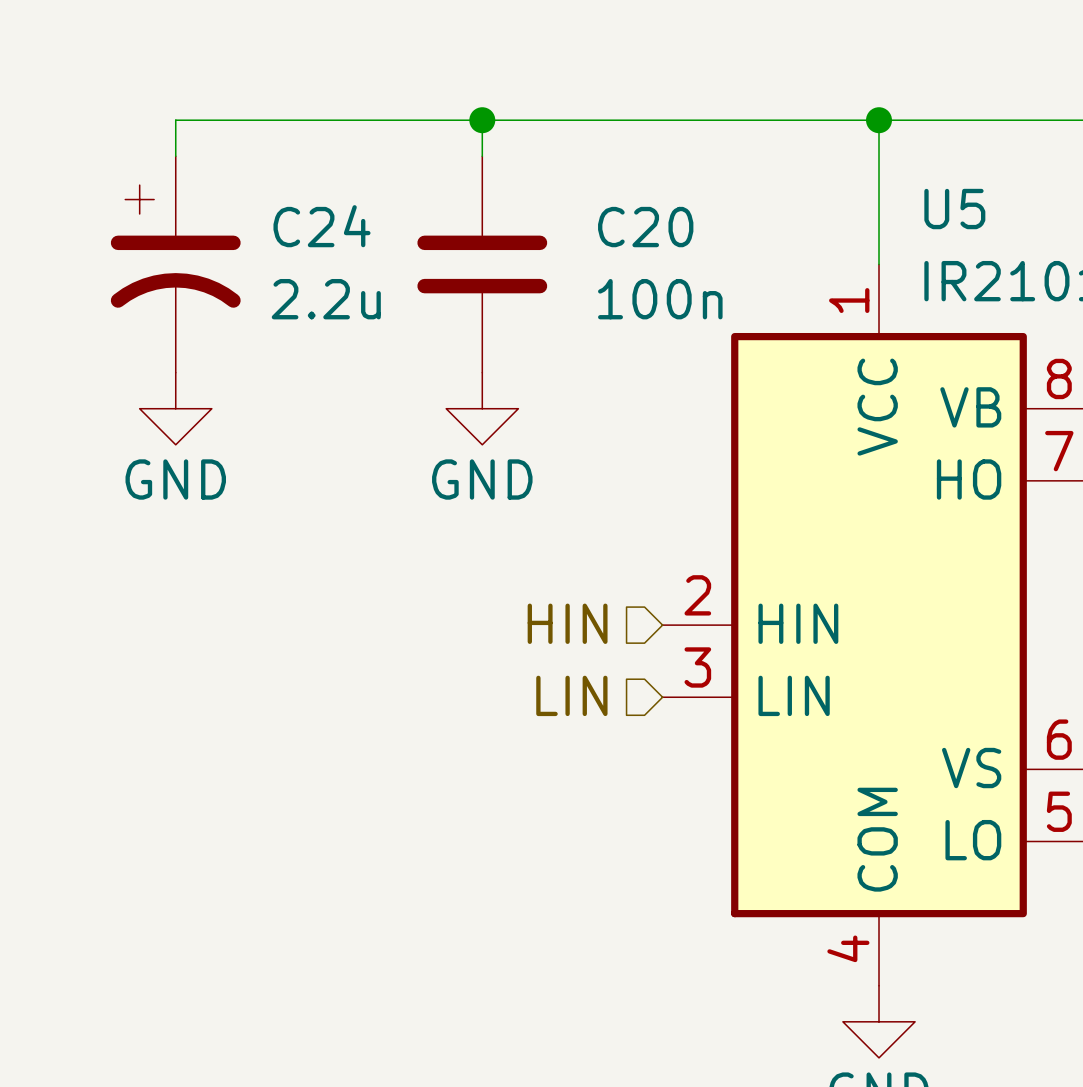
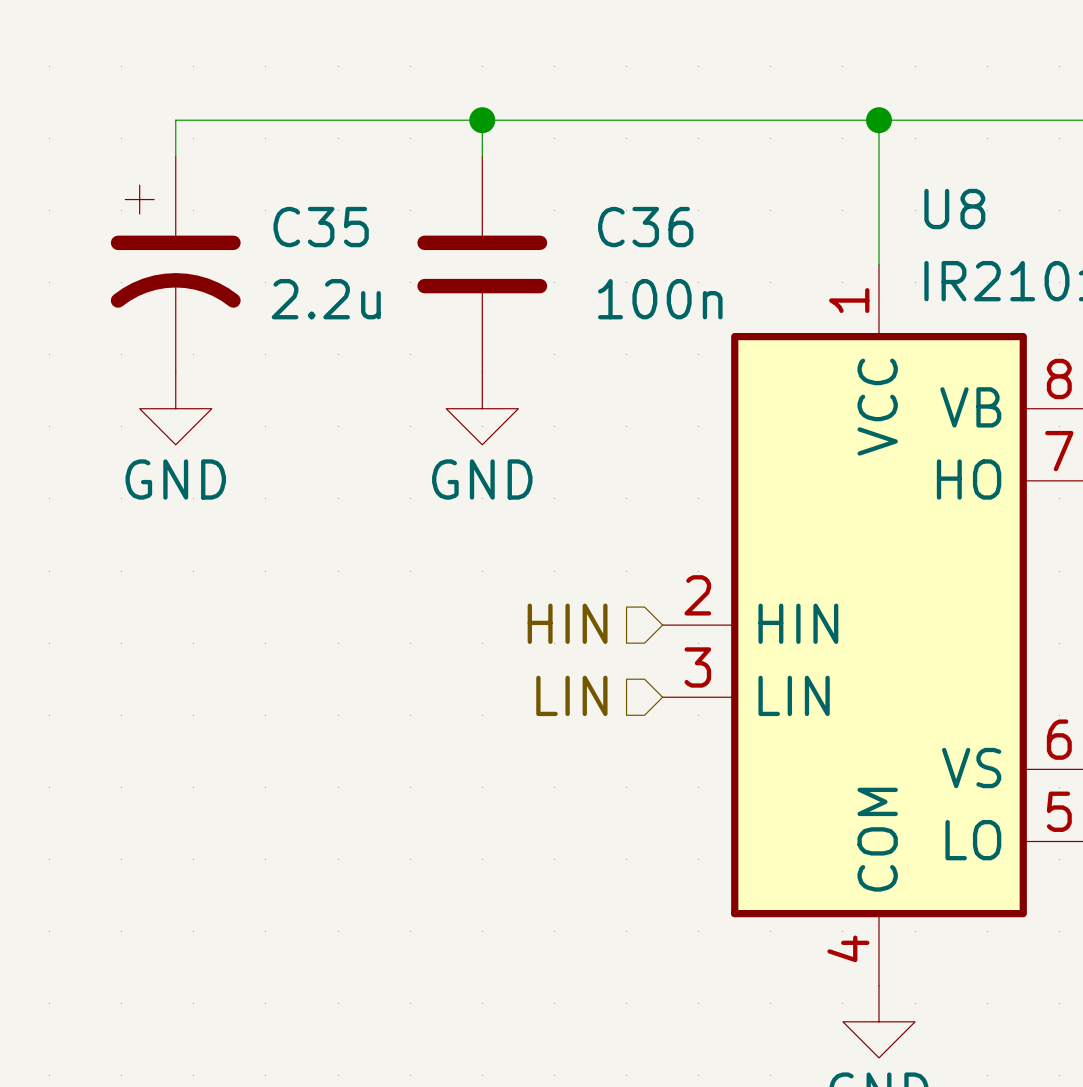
U5 name: U5 (954, 209) -> U8 (954, 209)
C24 name: C24 (321, 226) -> C35 (321, 227)
C20 name: C20 (645, 227) -> C36 (645, 227)

